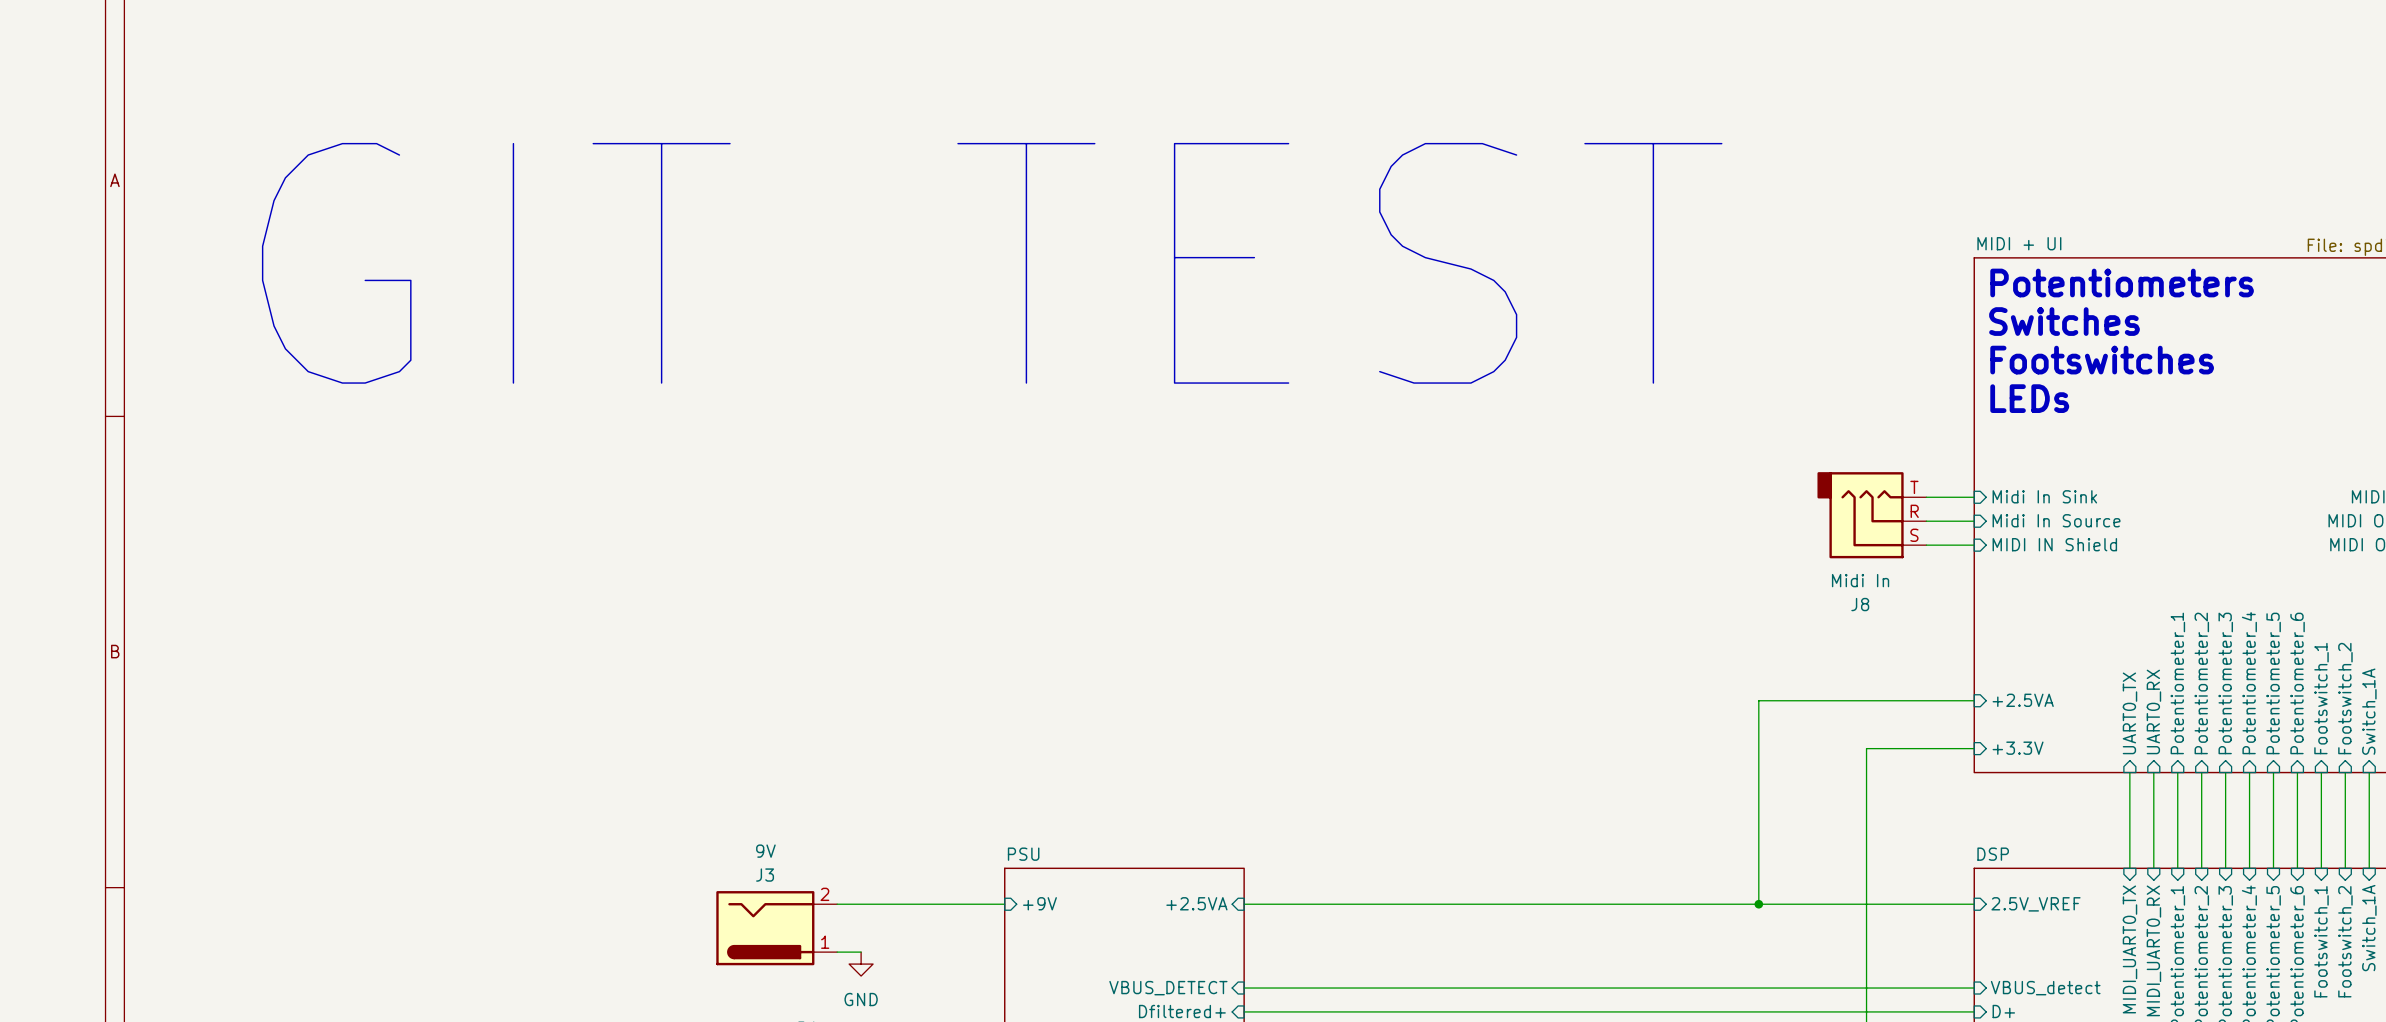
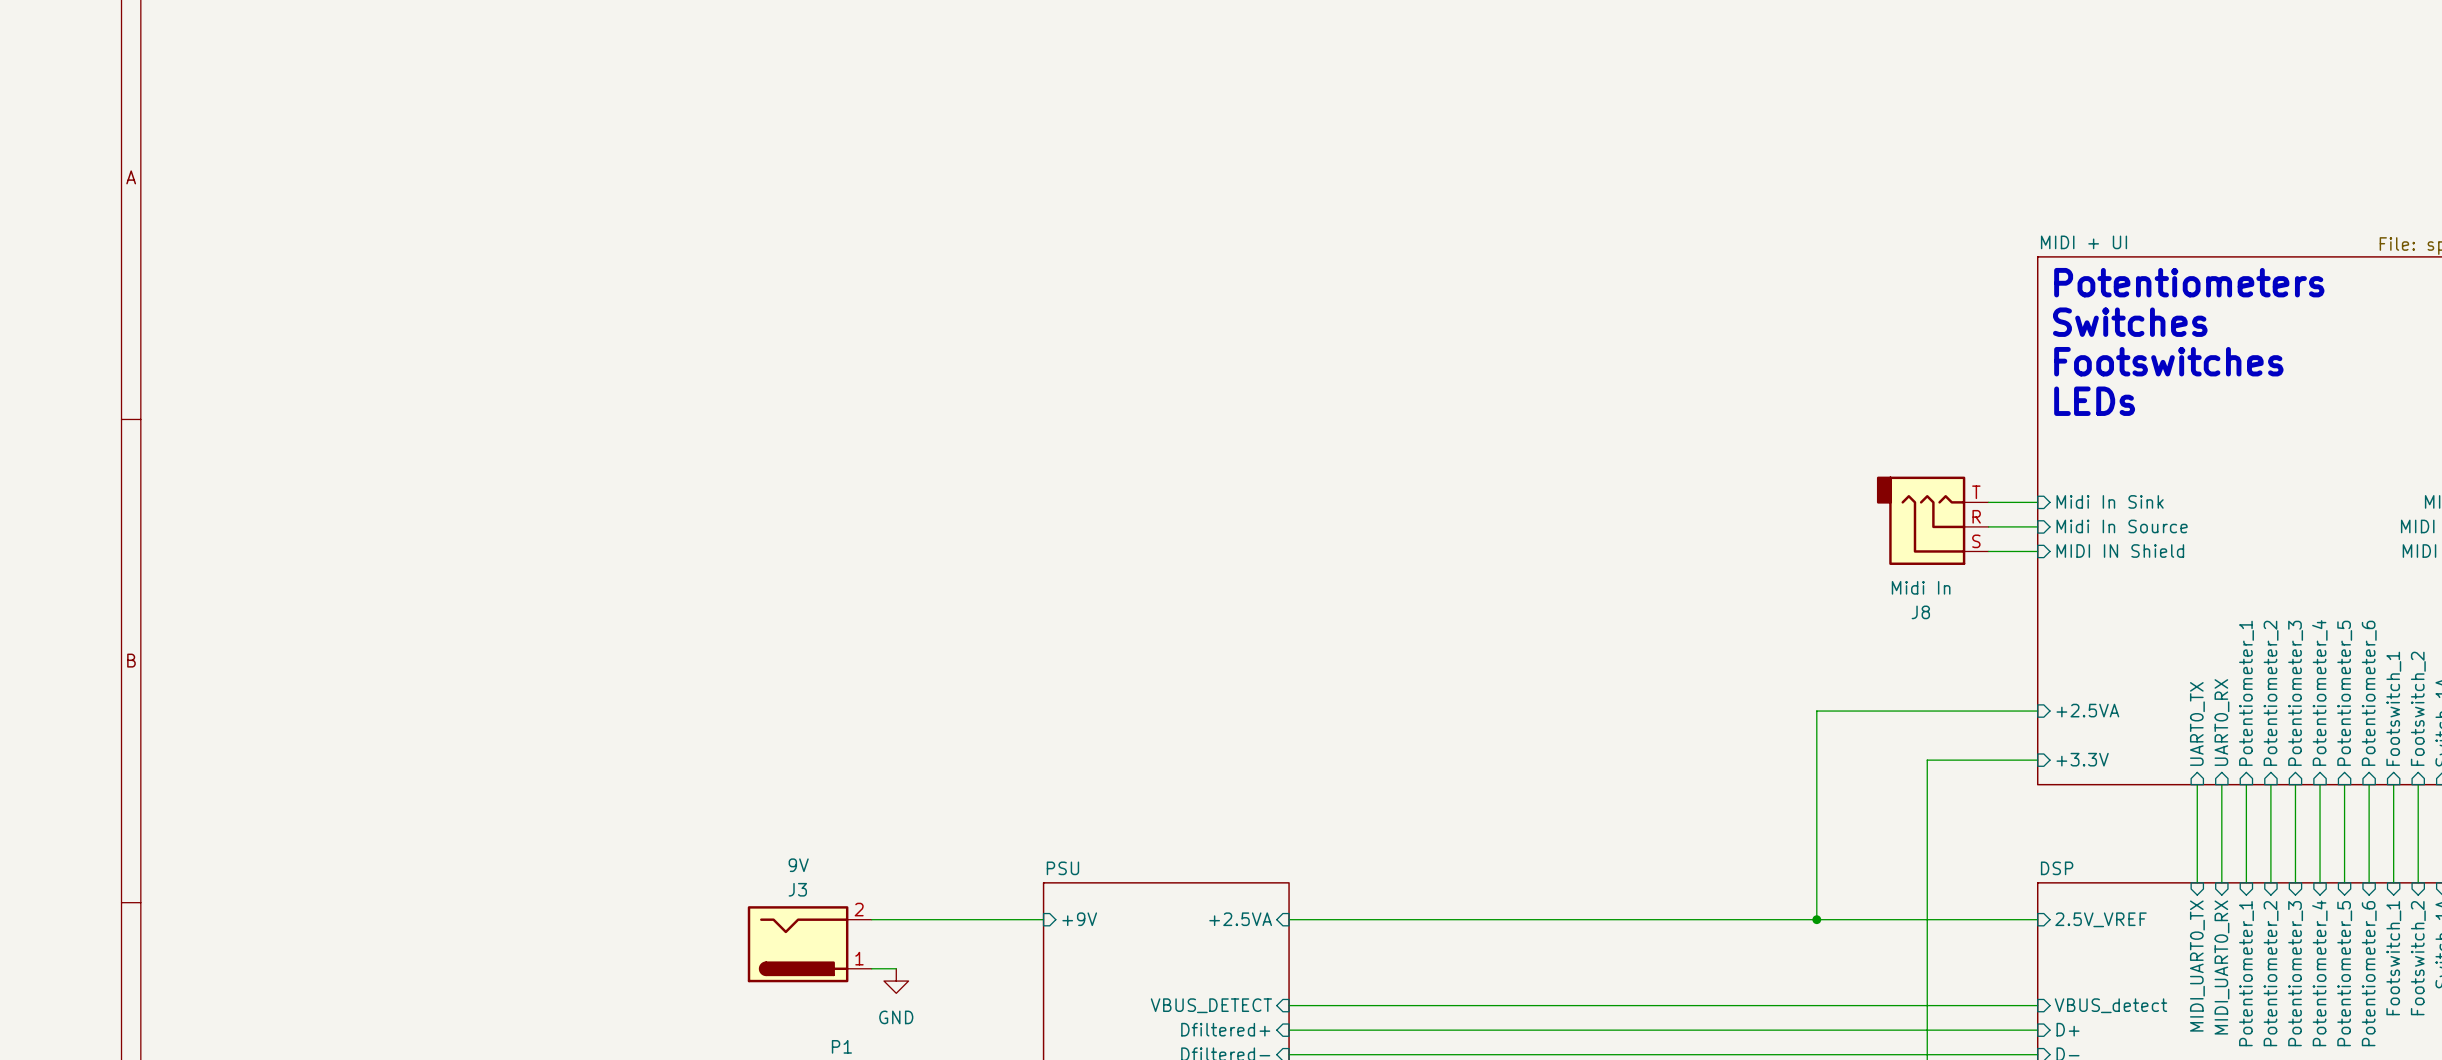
text: GIT TEST (992, 263) -> none

